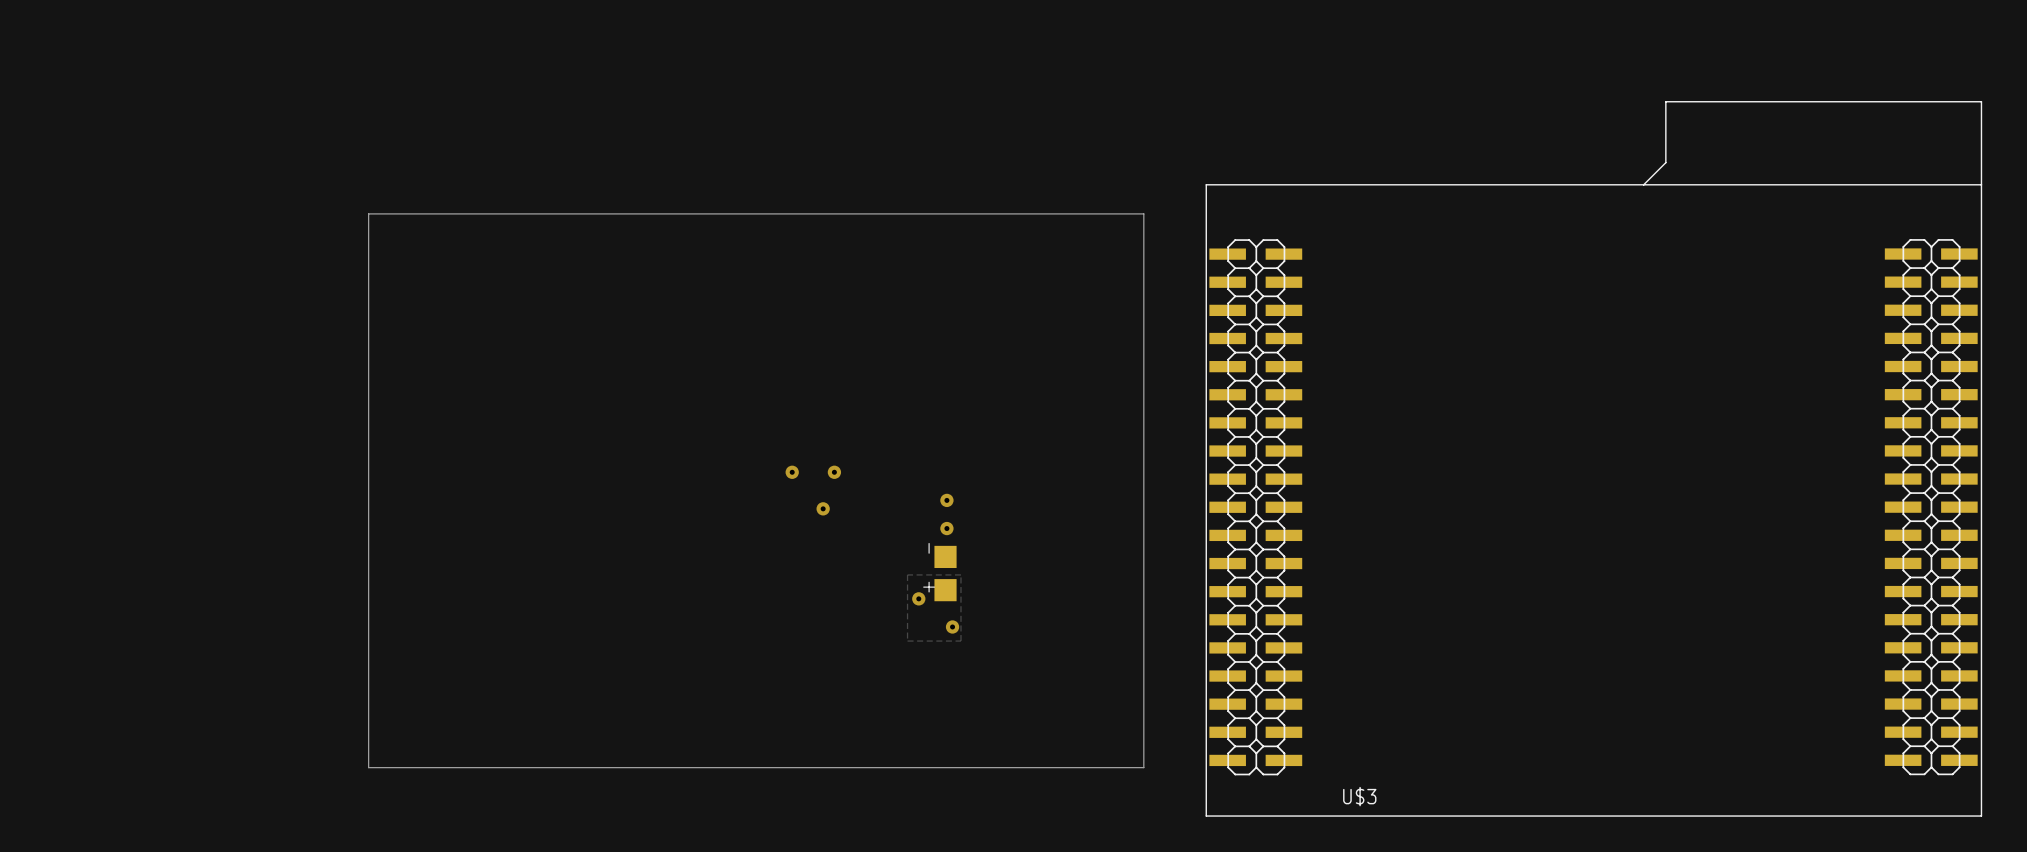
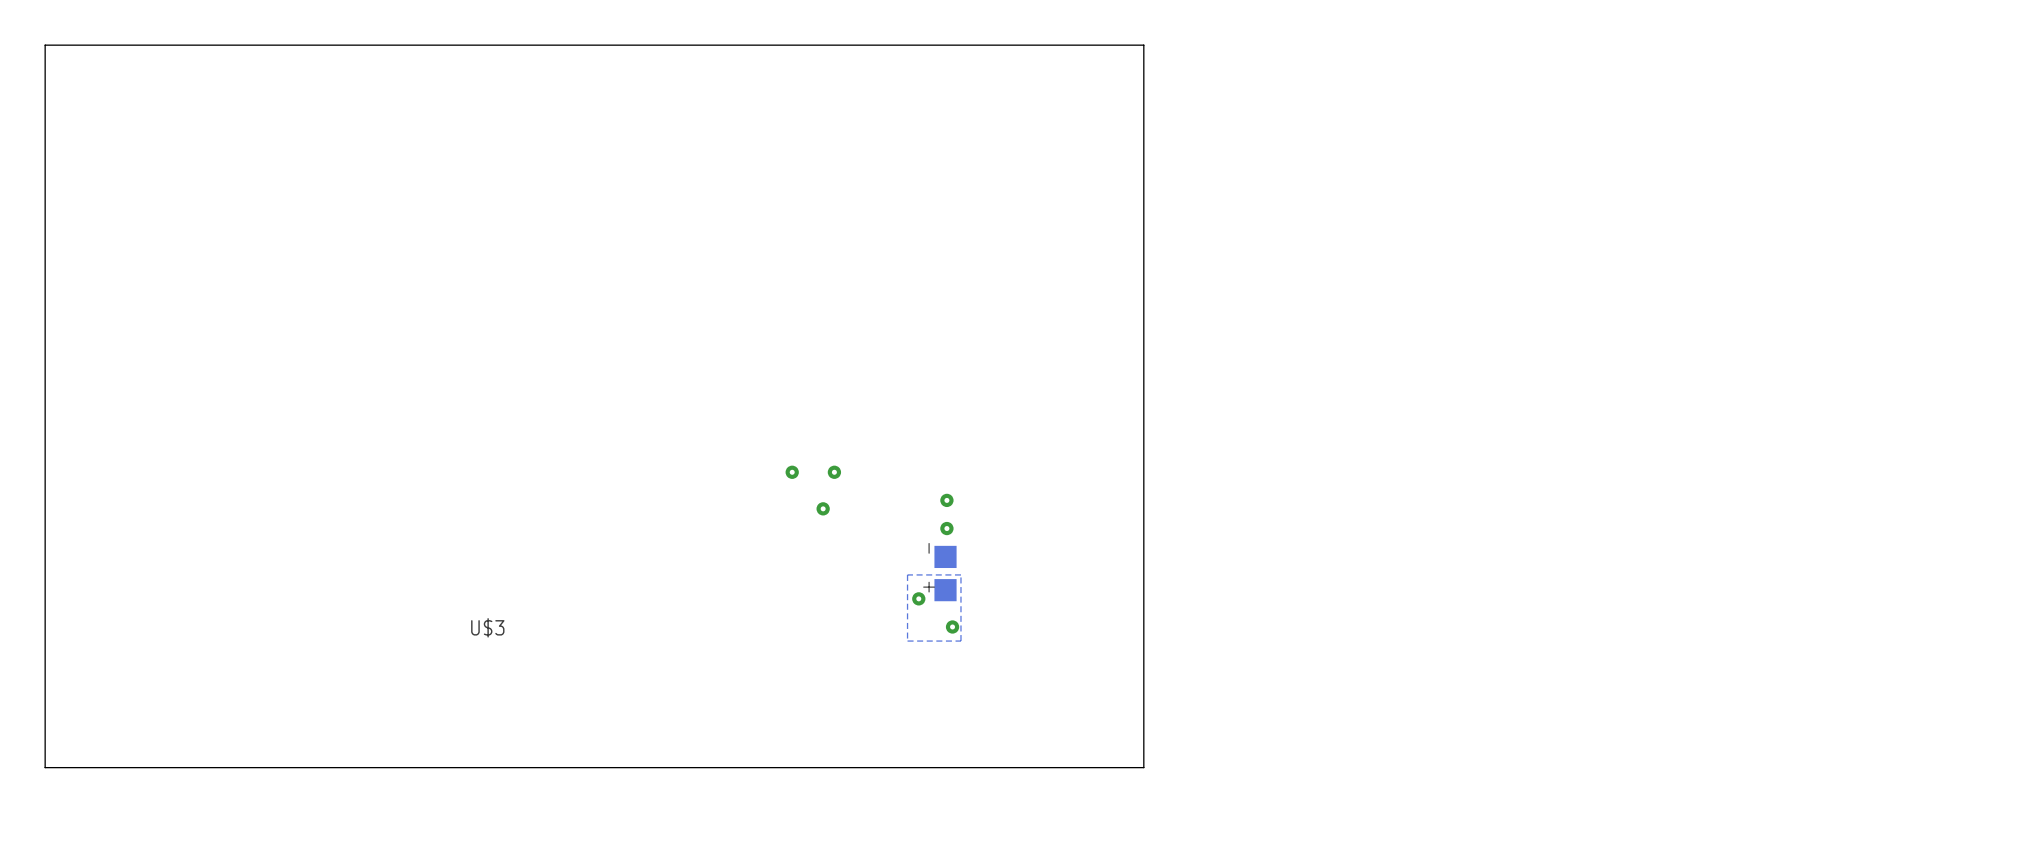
U$3 footprint: [1205, 101, 1983, 817] -> [471, 618, 505, 638]
board edge: (1143, 213) (368, 213) (368, 767) -> (1143, 213) (1143, 45) (45, 45) (45, 767) (368, 767)
U$3 name position: U$3 (1359, 796) -> U$3 (487, 627)

